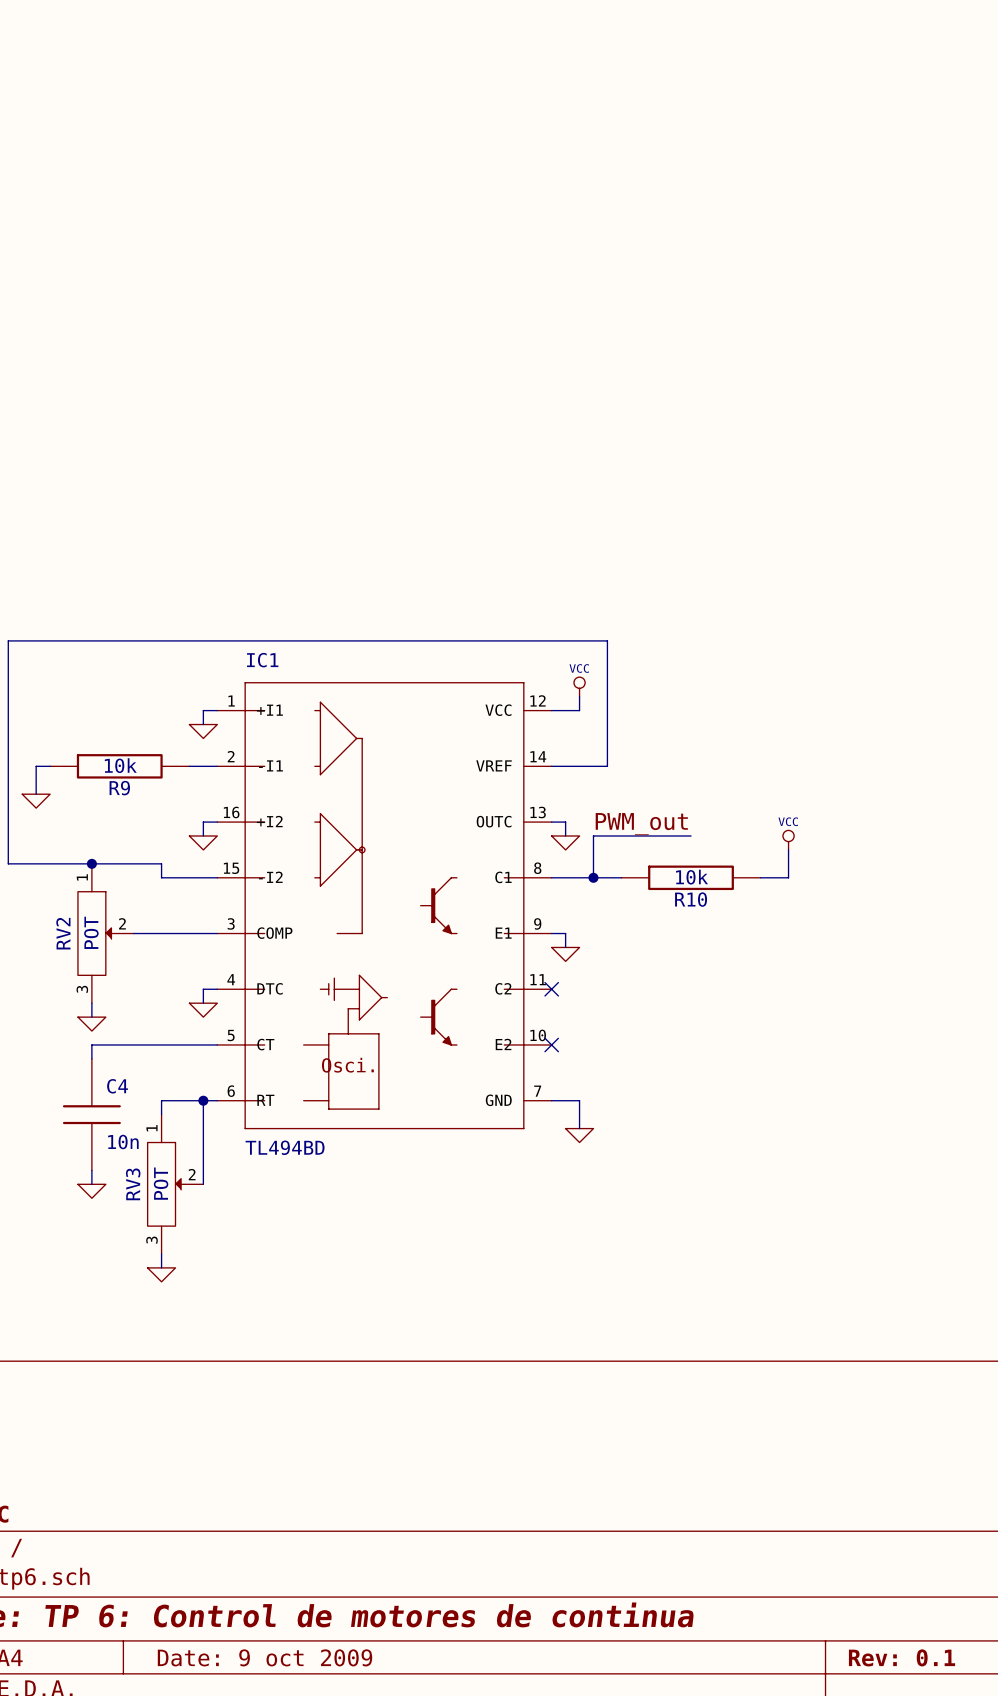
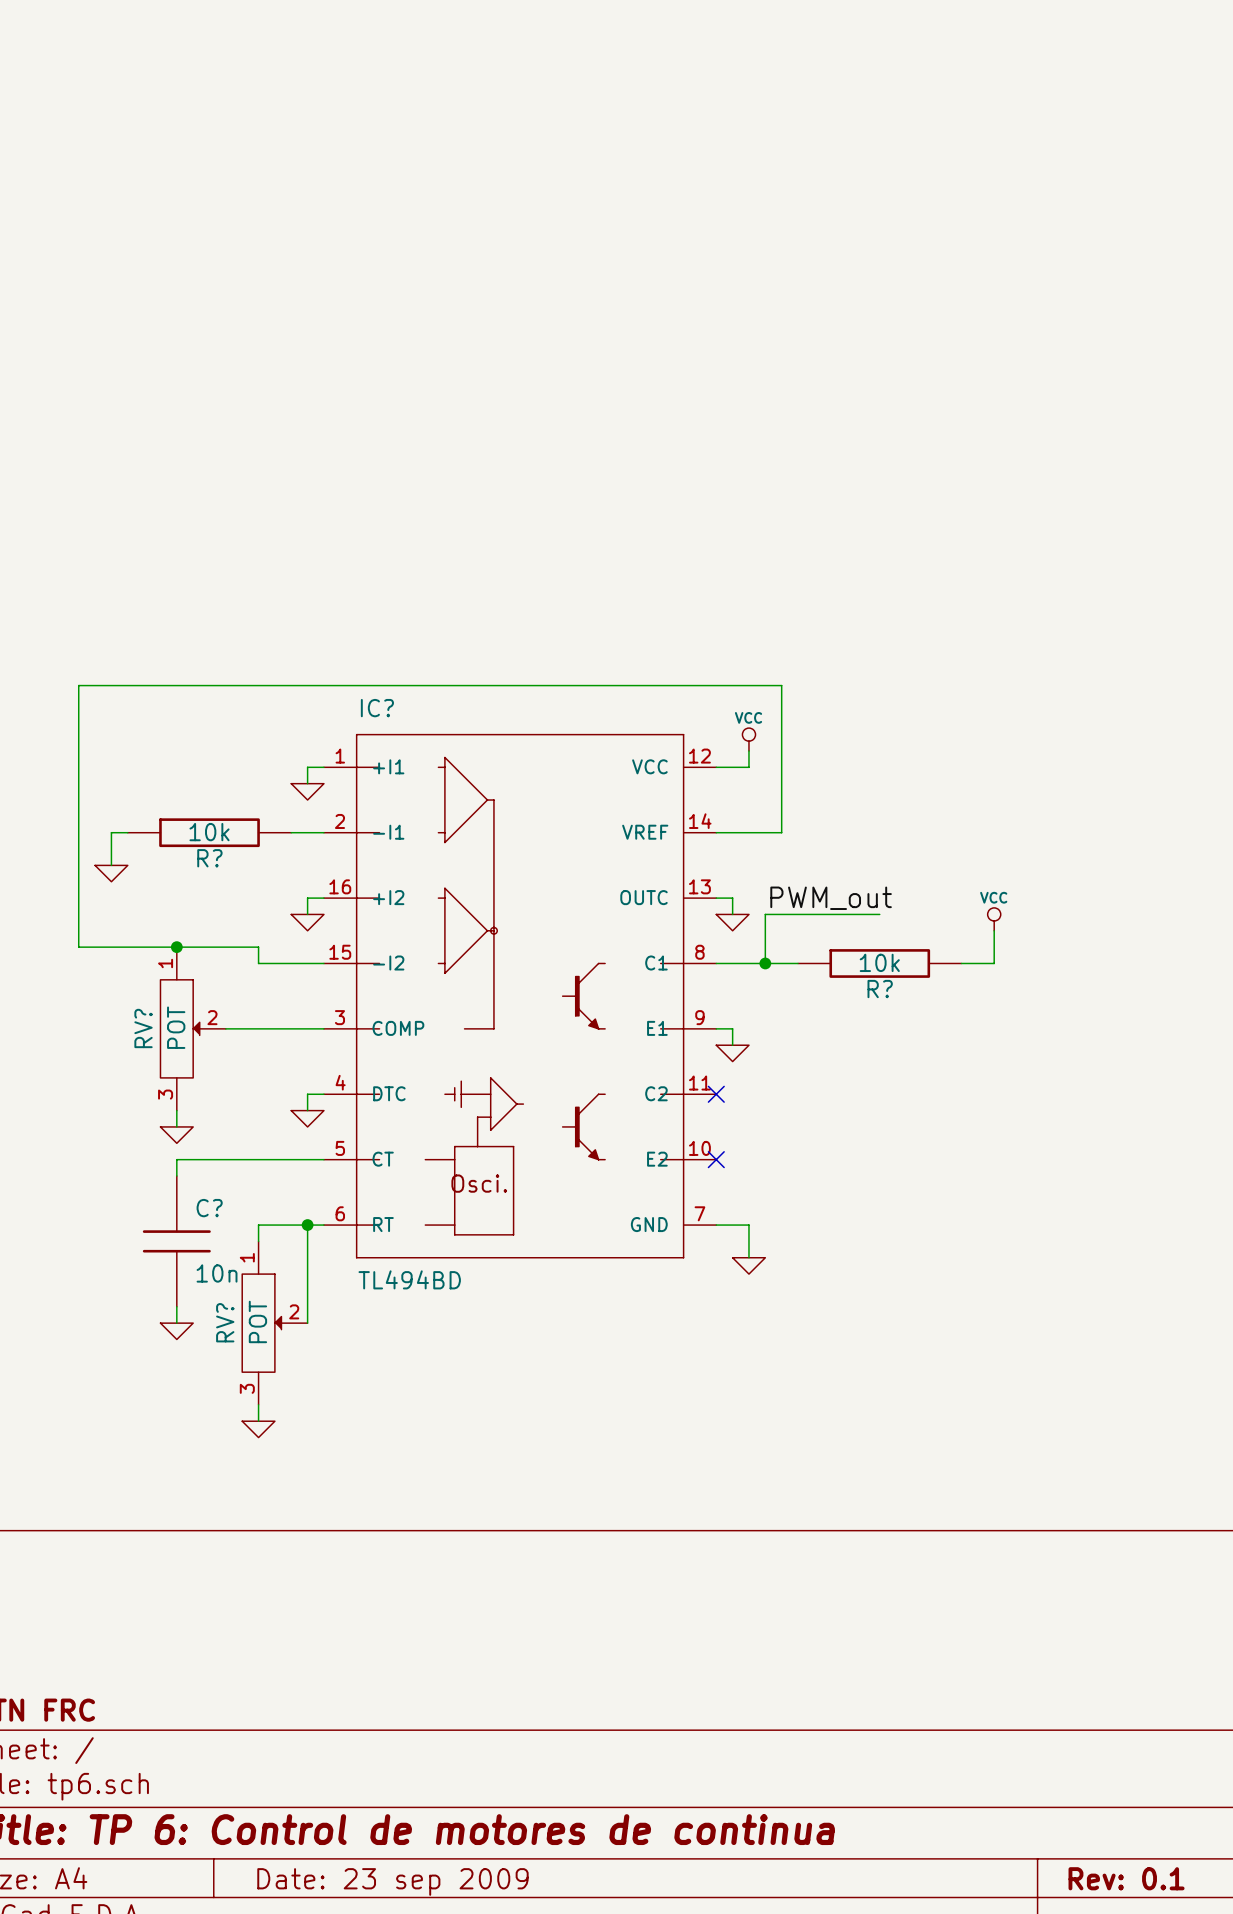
IC1 name: IC1 (262, 660) -> IC? (377, 708)
R9 name: R9 (119, 788) -> R? (209, 858)
R10 name: R10 (691, 899) -> R? (880, 989)
RV2 name: RV2 (63, 933) -> RV? (143, 1028)
C4 name: C4 (117, 1086) -> C? (209, 1208)
RV3 name: RV3 (133, 1184) -> RV? (225, 1322)
title block: Date: 9 oct 2009 (265, 1657) -> Date: 23 sep 2009 (392, 1881)

